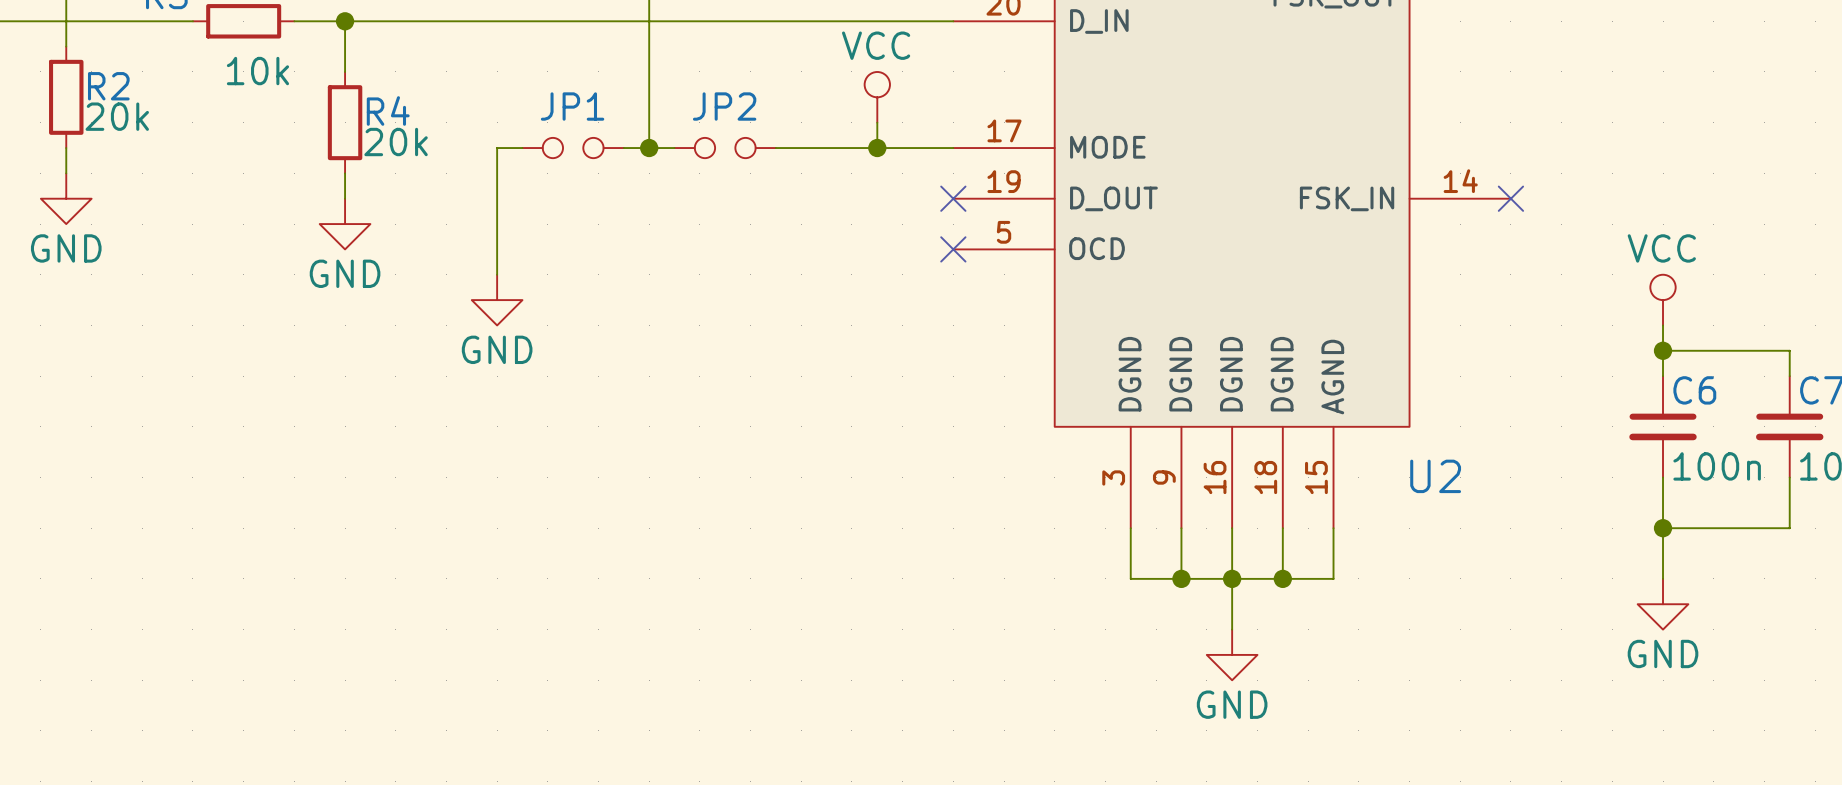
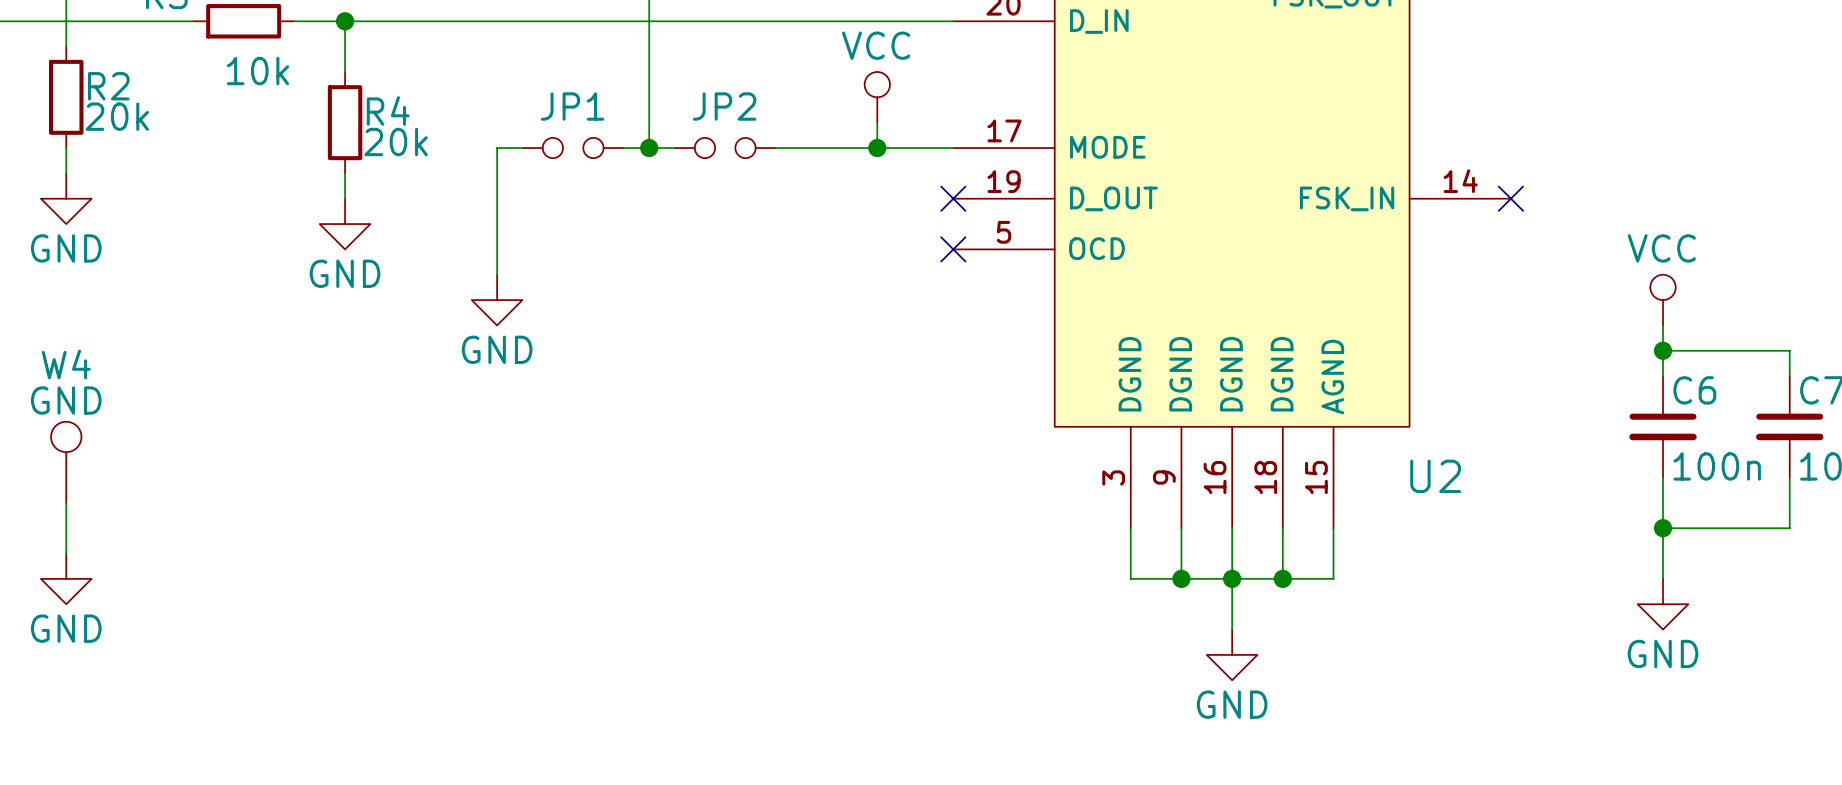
W4: none -> GND (66, 462)
wire: none -> (66, 502) (66, 553)
power symbol: none -> GND (66, 578)

